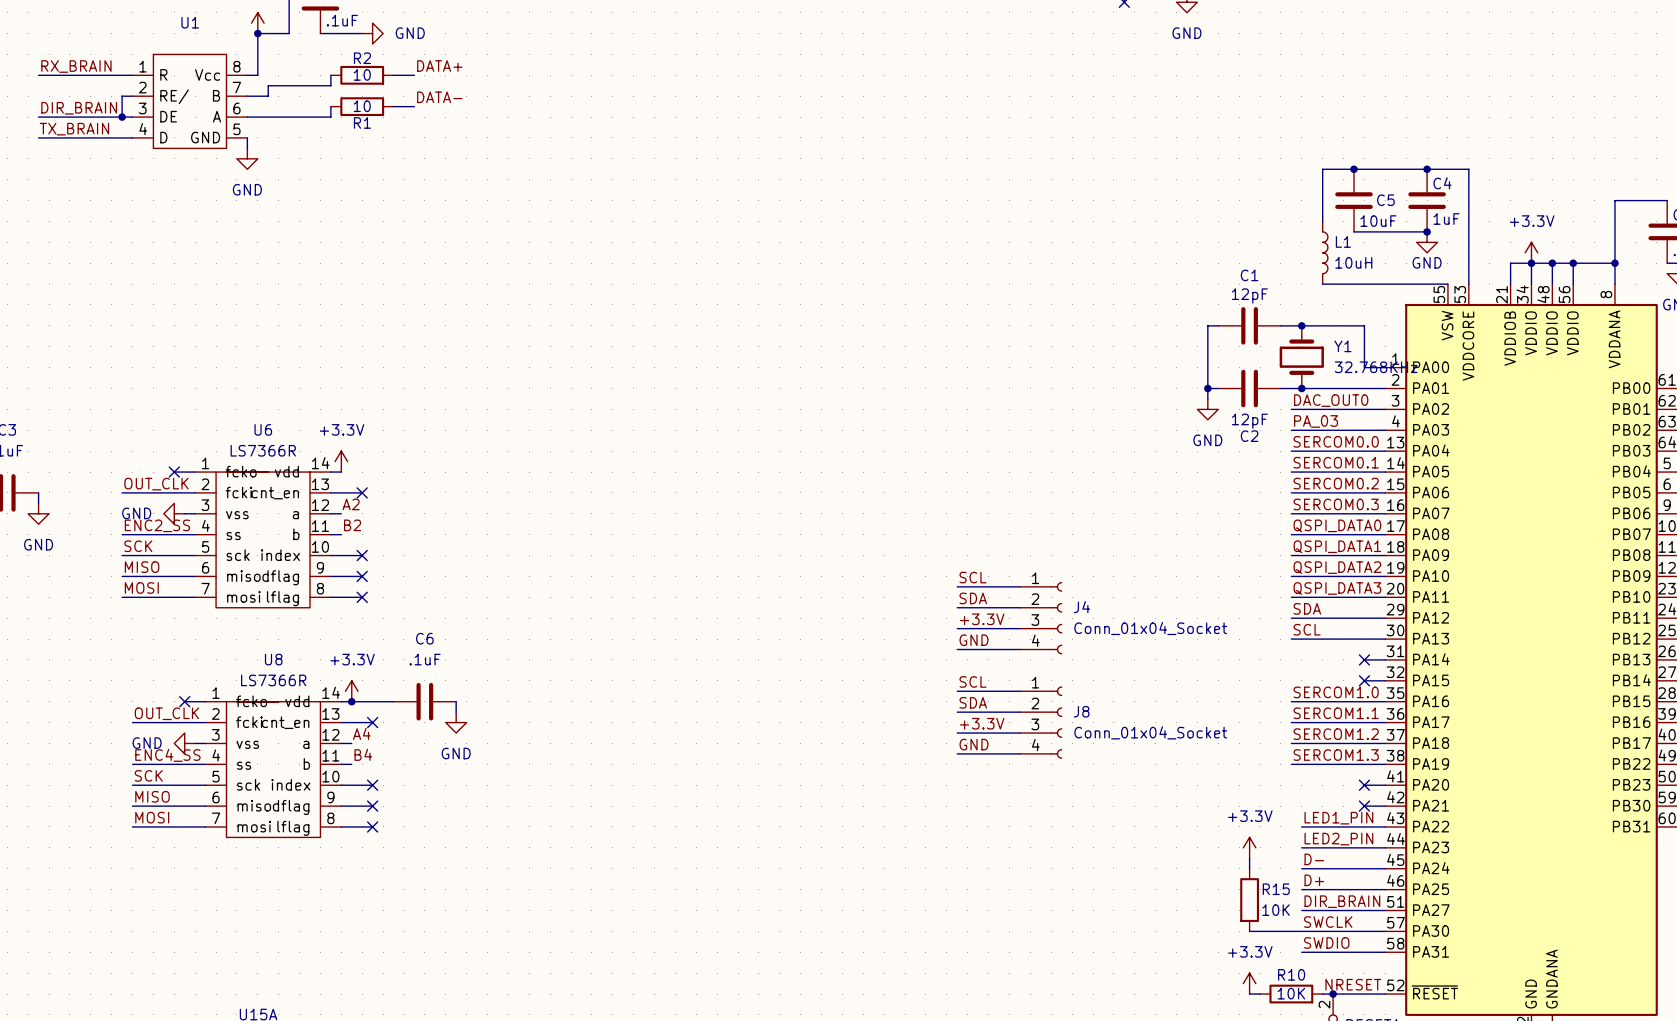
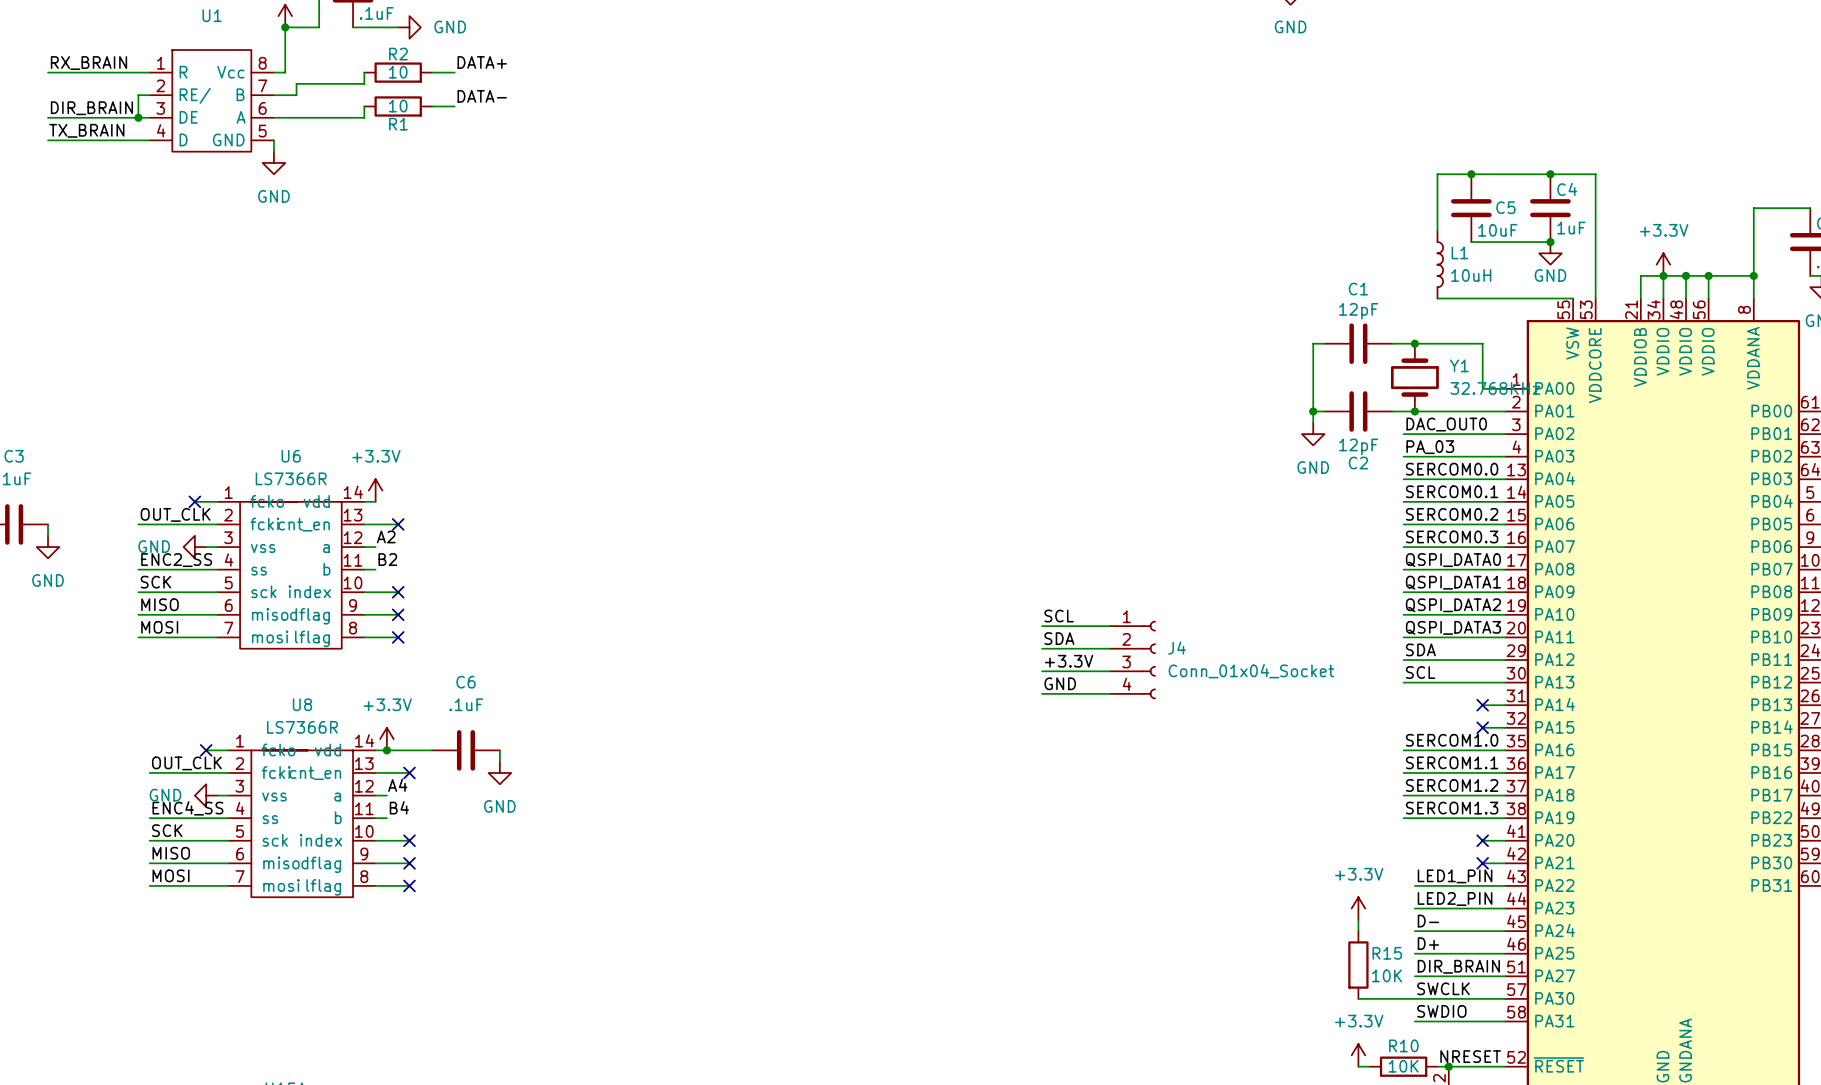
label: SCL (973, 681) -> none
wire: (957, 691) (1019, 691) -> none
label: SDA (973, 702) -> none
wire: (957, 712) (1019, 712) -> none
J8: Conn_01x04_Socket (1041, 722) -> none
label: +3.3V (982, 723) -> none
wire: (957, 733) (1019, 733) -> none
label: GND (974, 744) -> none
wire: (957, 753) (1019, 753) -> none

